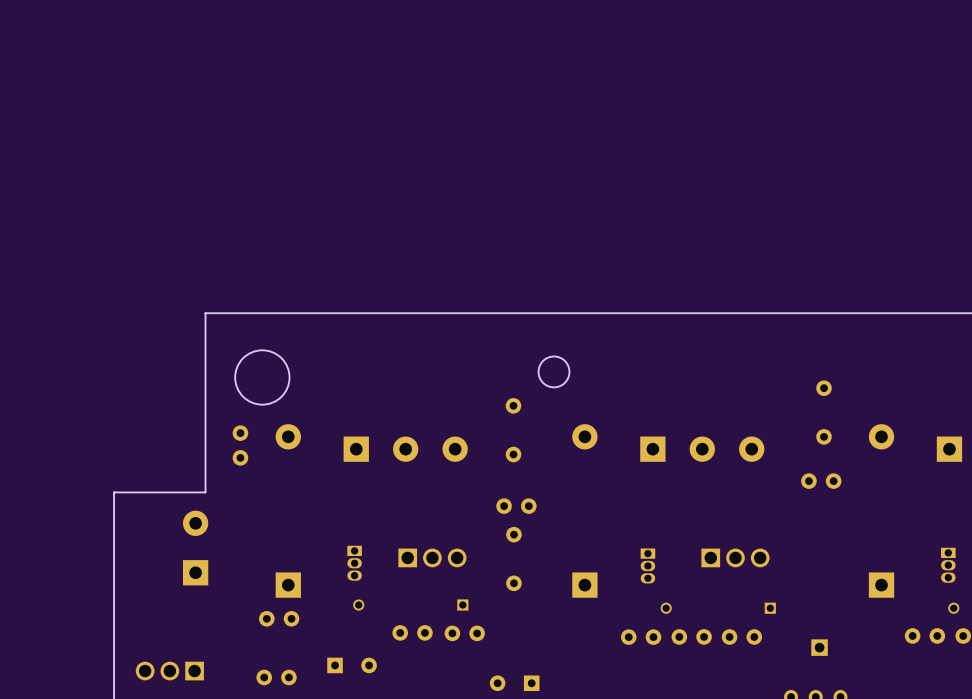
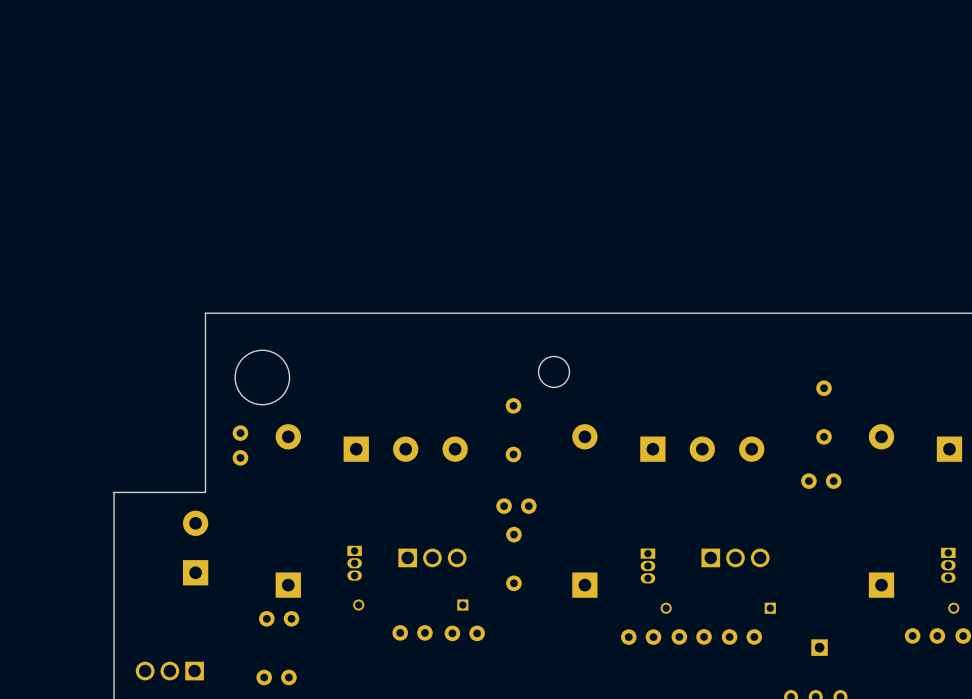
part: (352, 665) -> none
part: (514, 683) -> none

